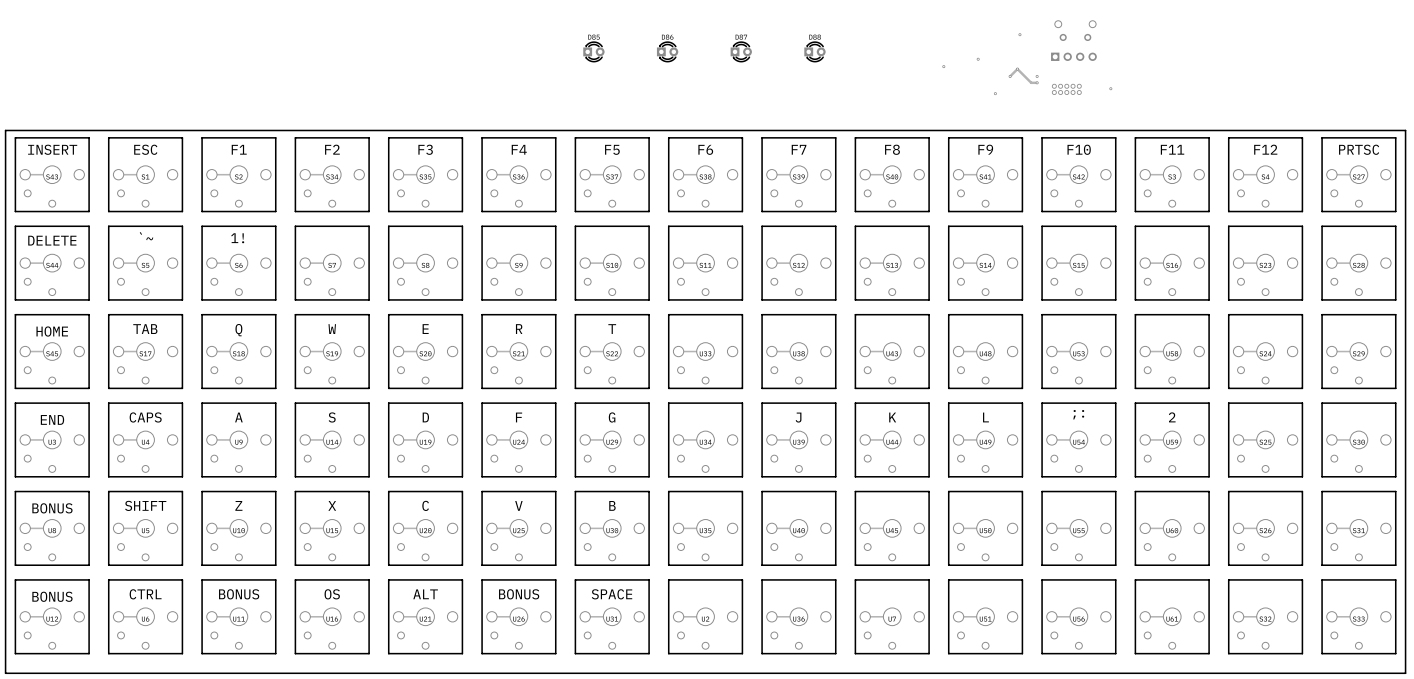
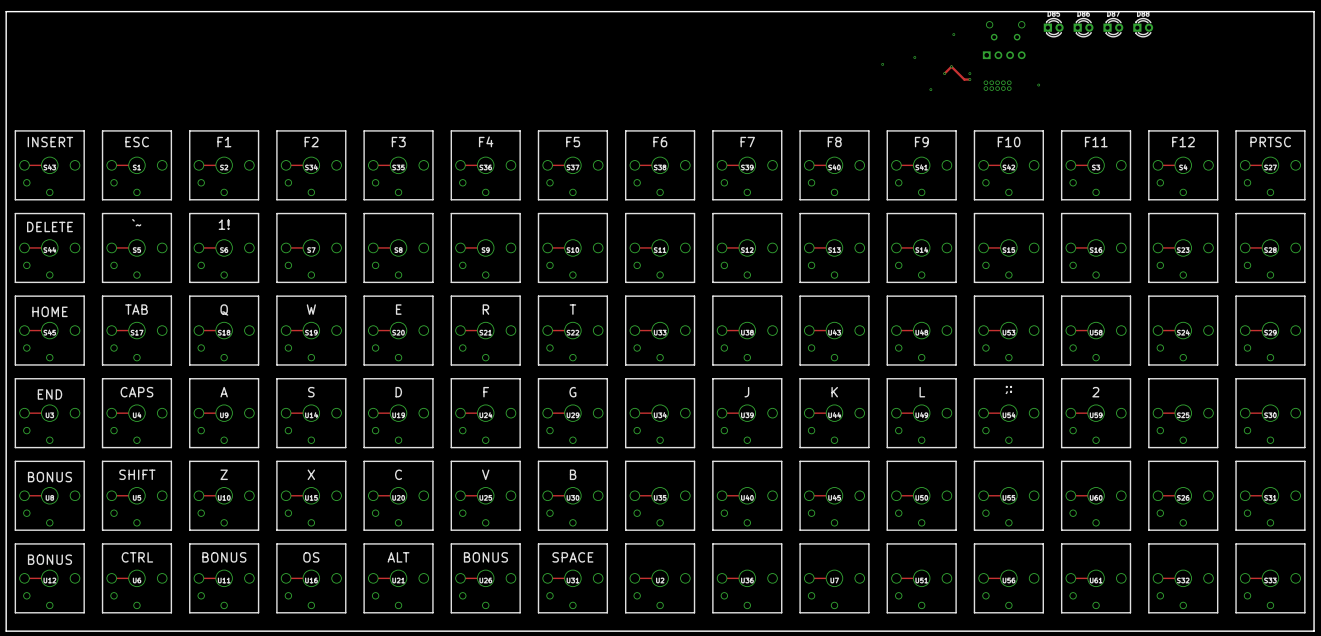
part position: (593, 51) -> (1053, 27)
part position: (667, 51) -> (1083, 27)
part position: (741, 51) -> (1113, 27)
part position: (814, 51) -> (1143, 27)
board edge: (5, 130) (1405, 130) -> (6, 124) (6, 11) (1314, 11) (1314, 124)

